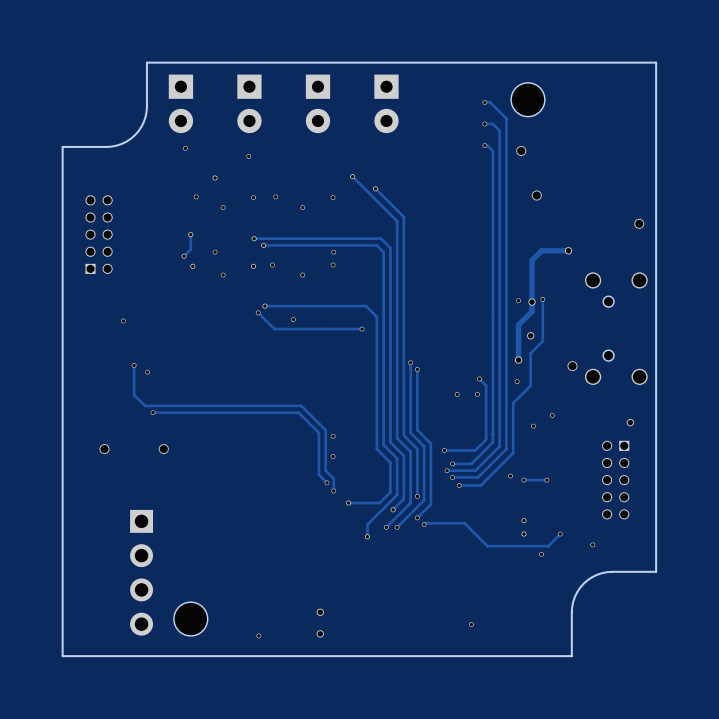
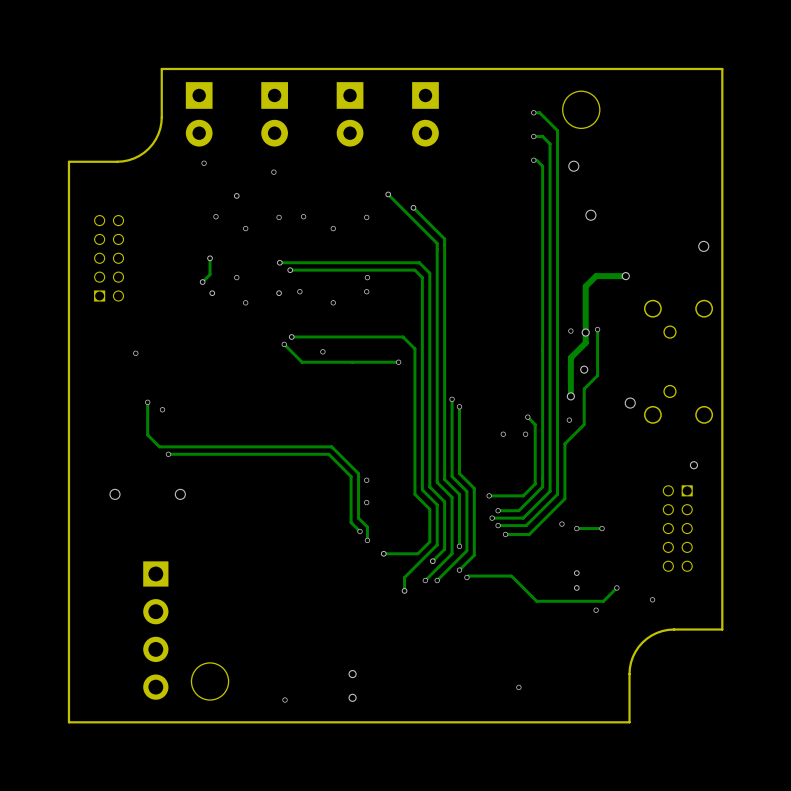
via: (552, 415) -> none
via: (533, 426) -> none

